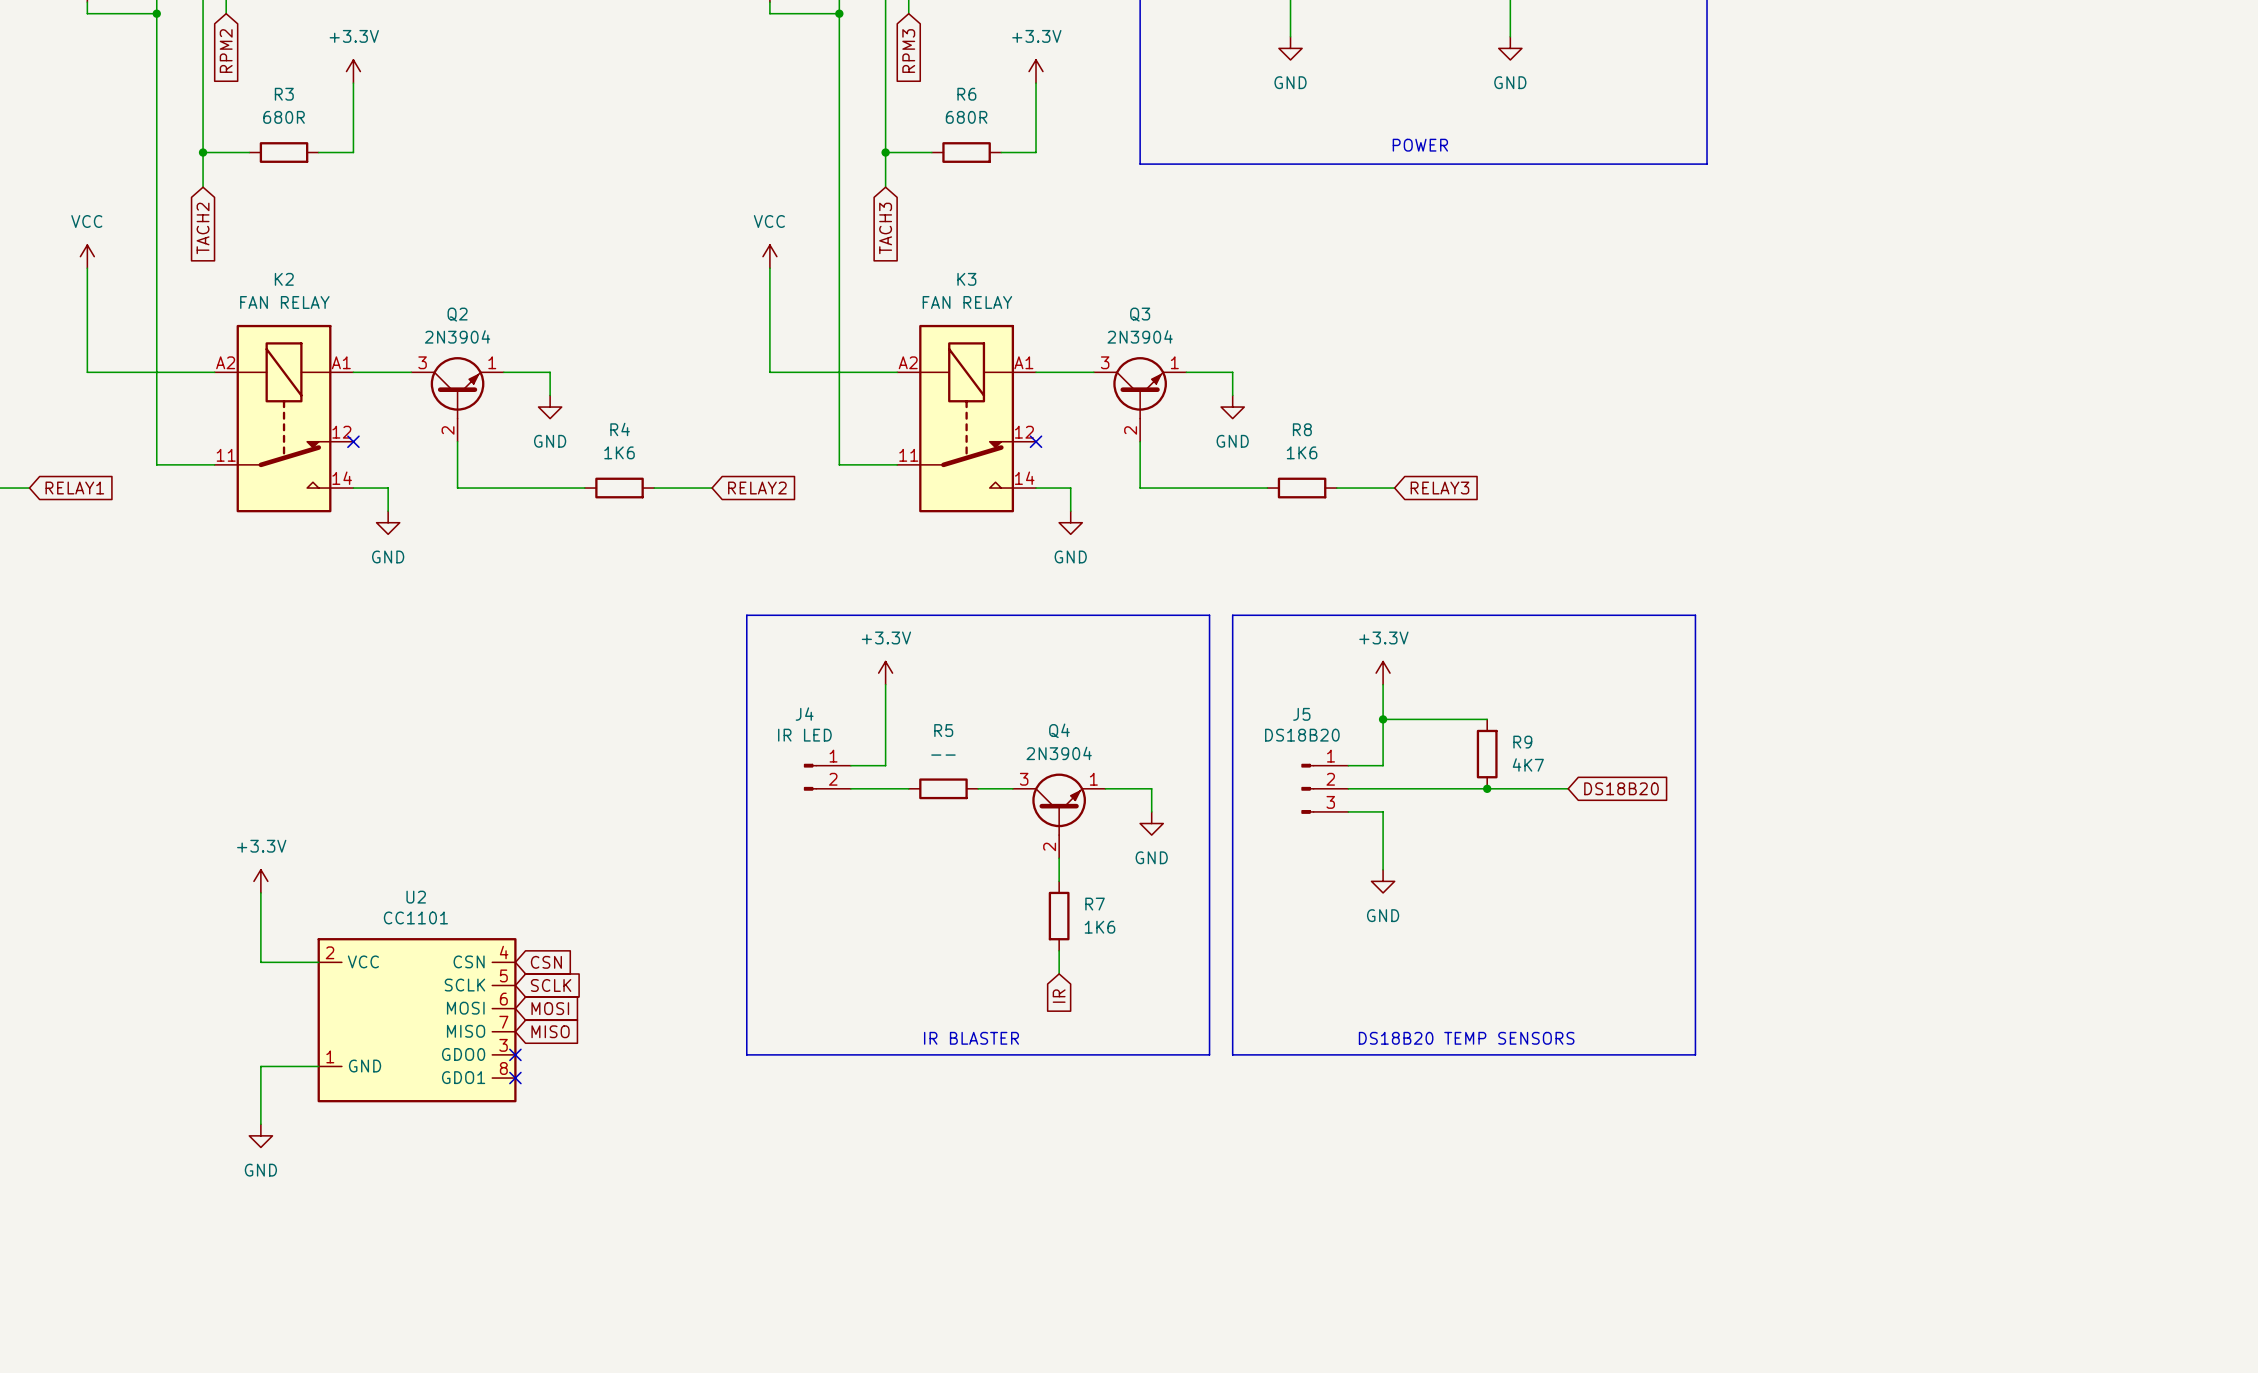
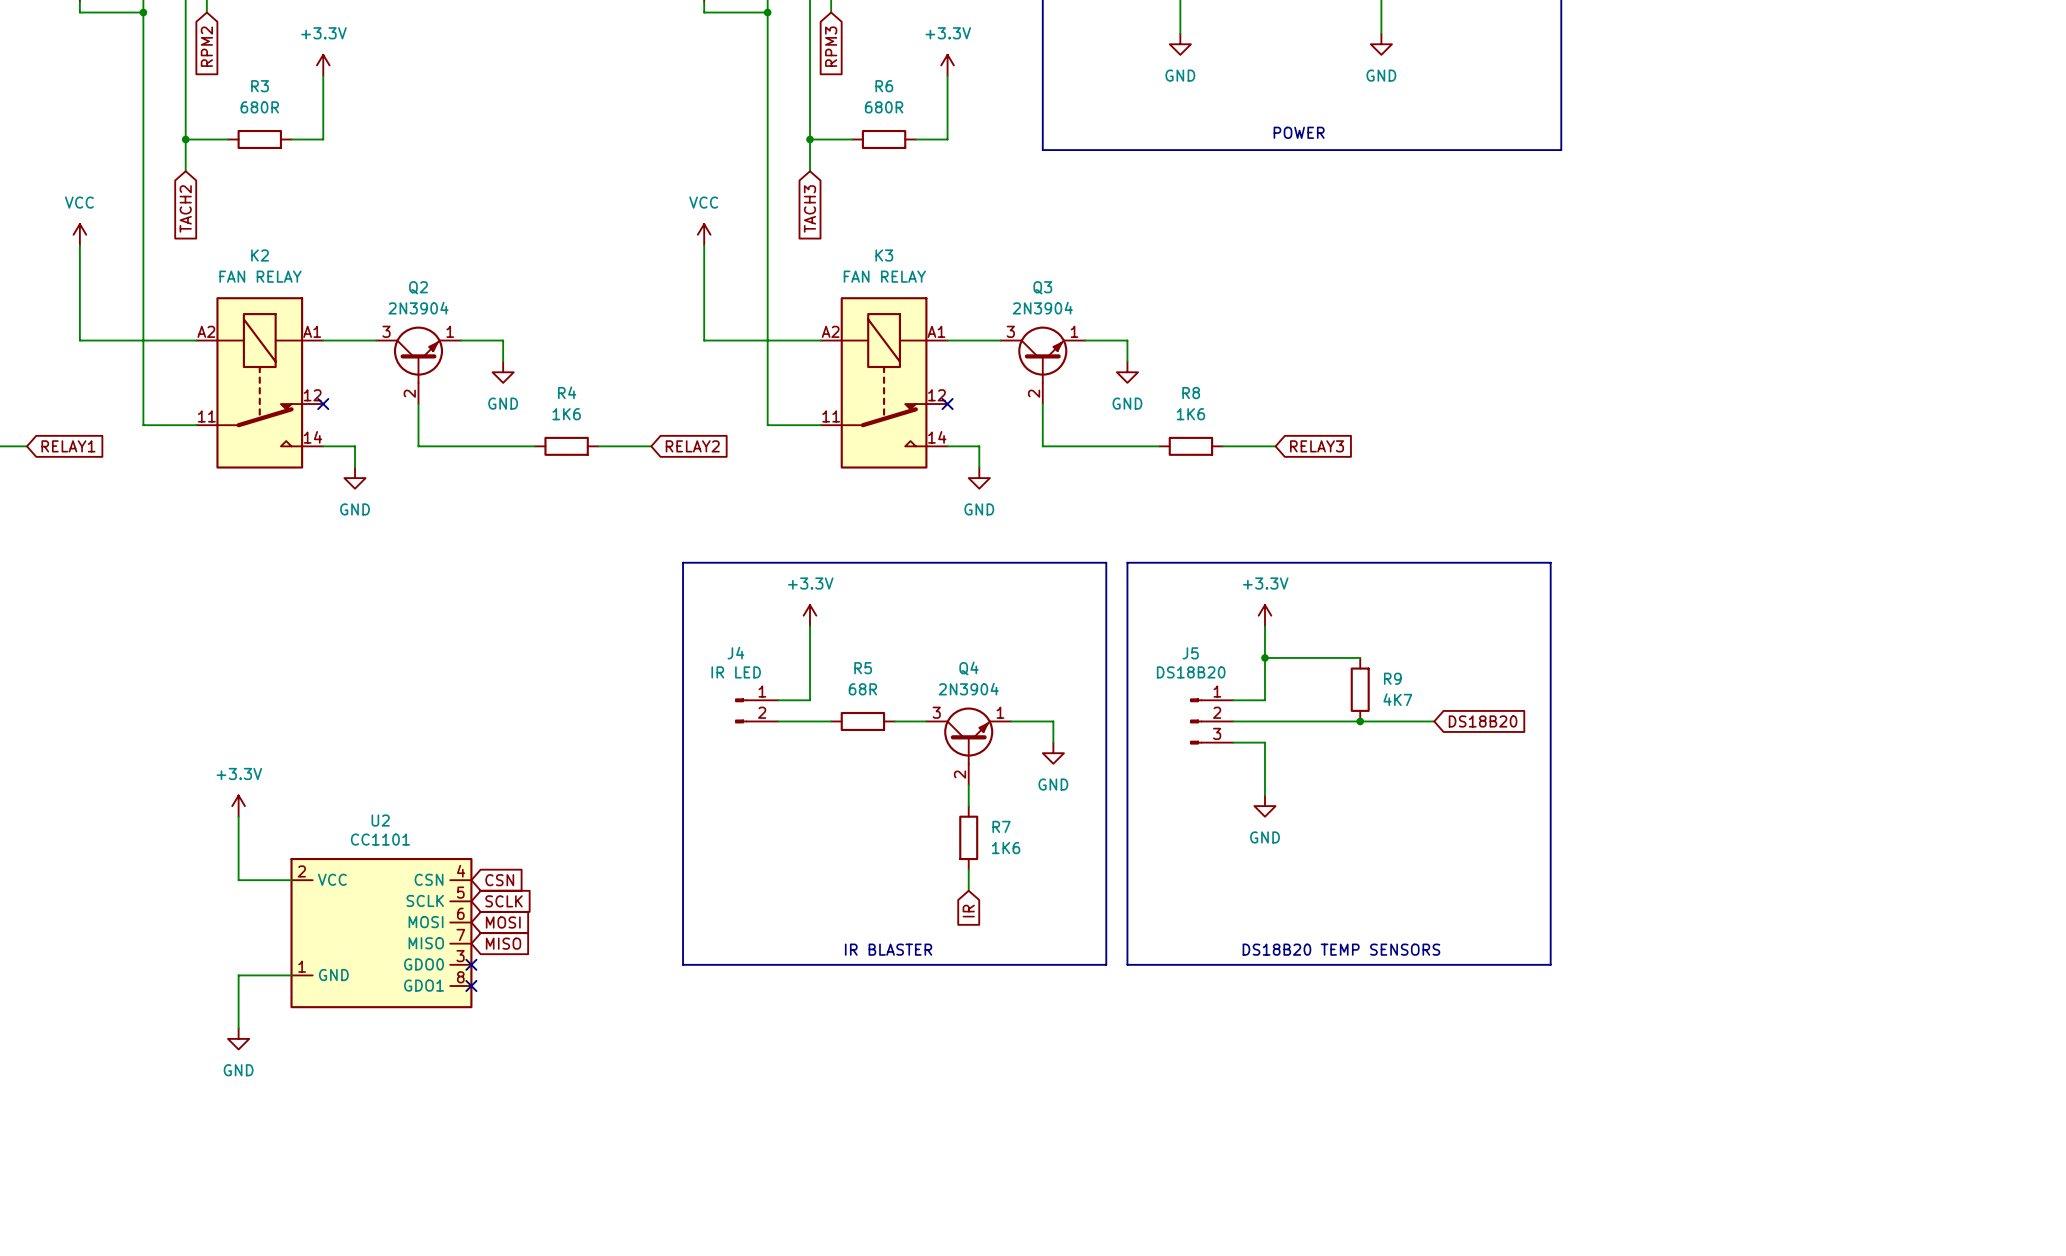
R5 value: -- (943, 755) -> 68R (862, 689)

